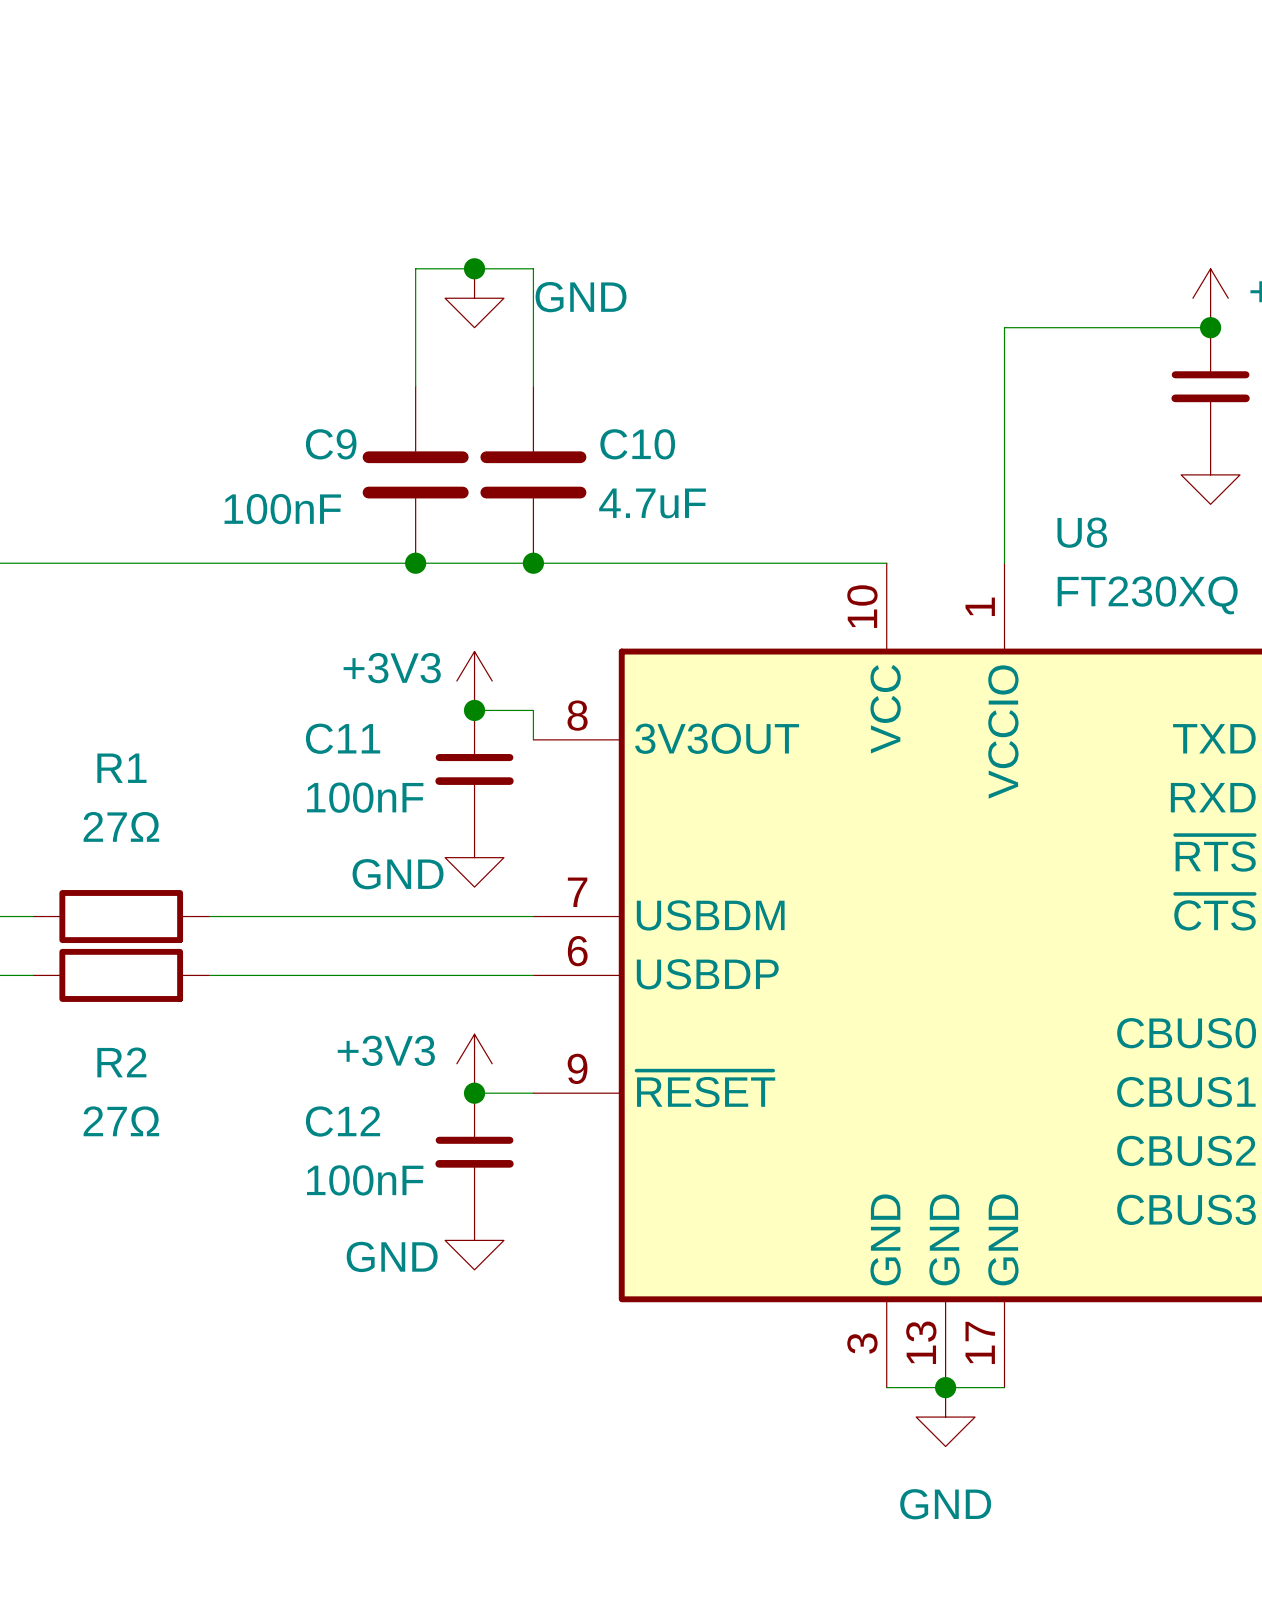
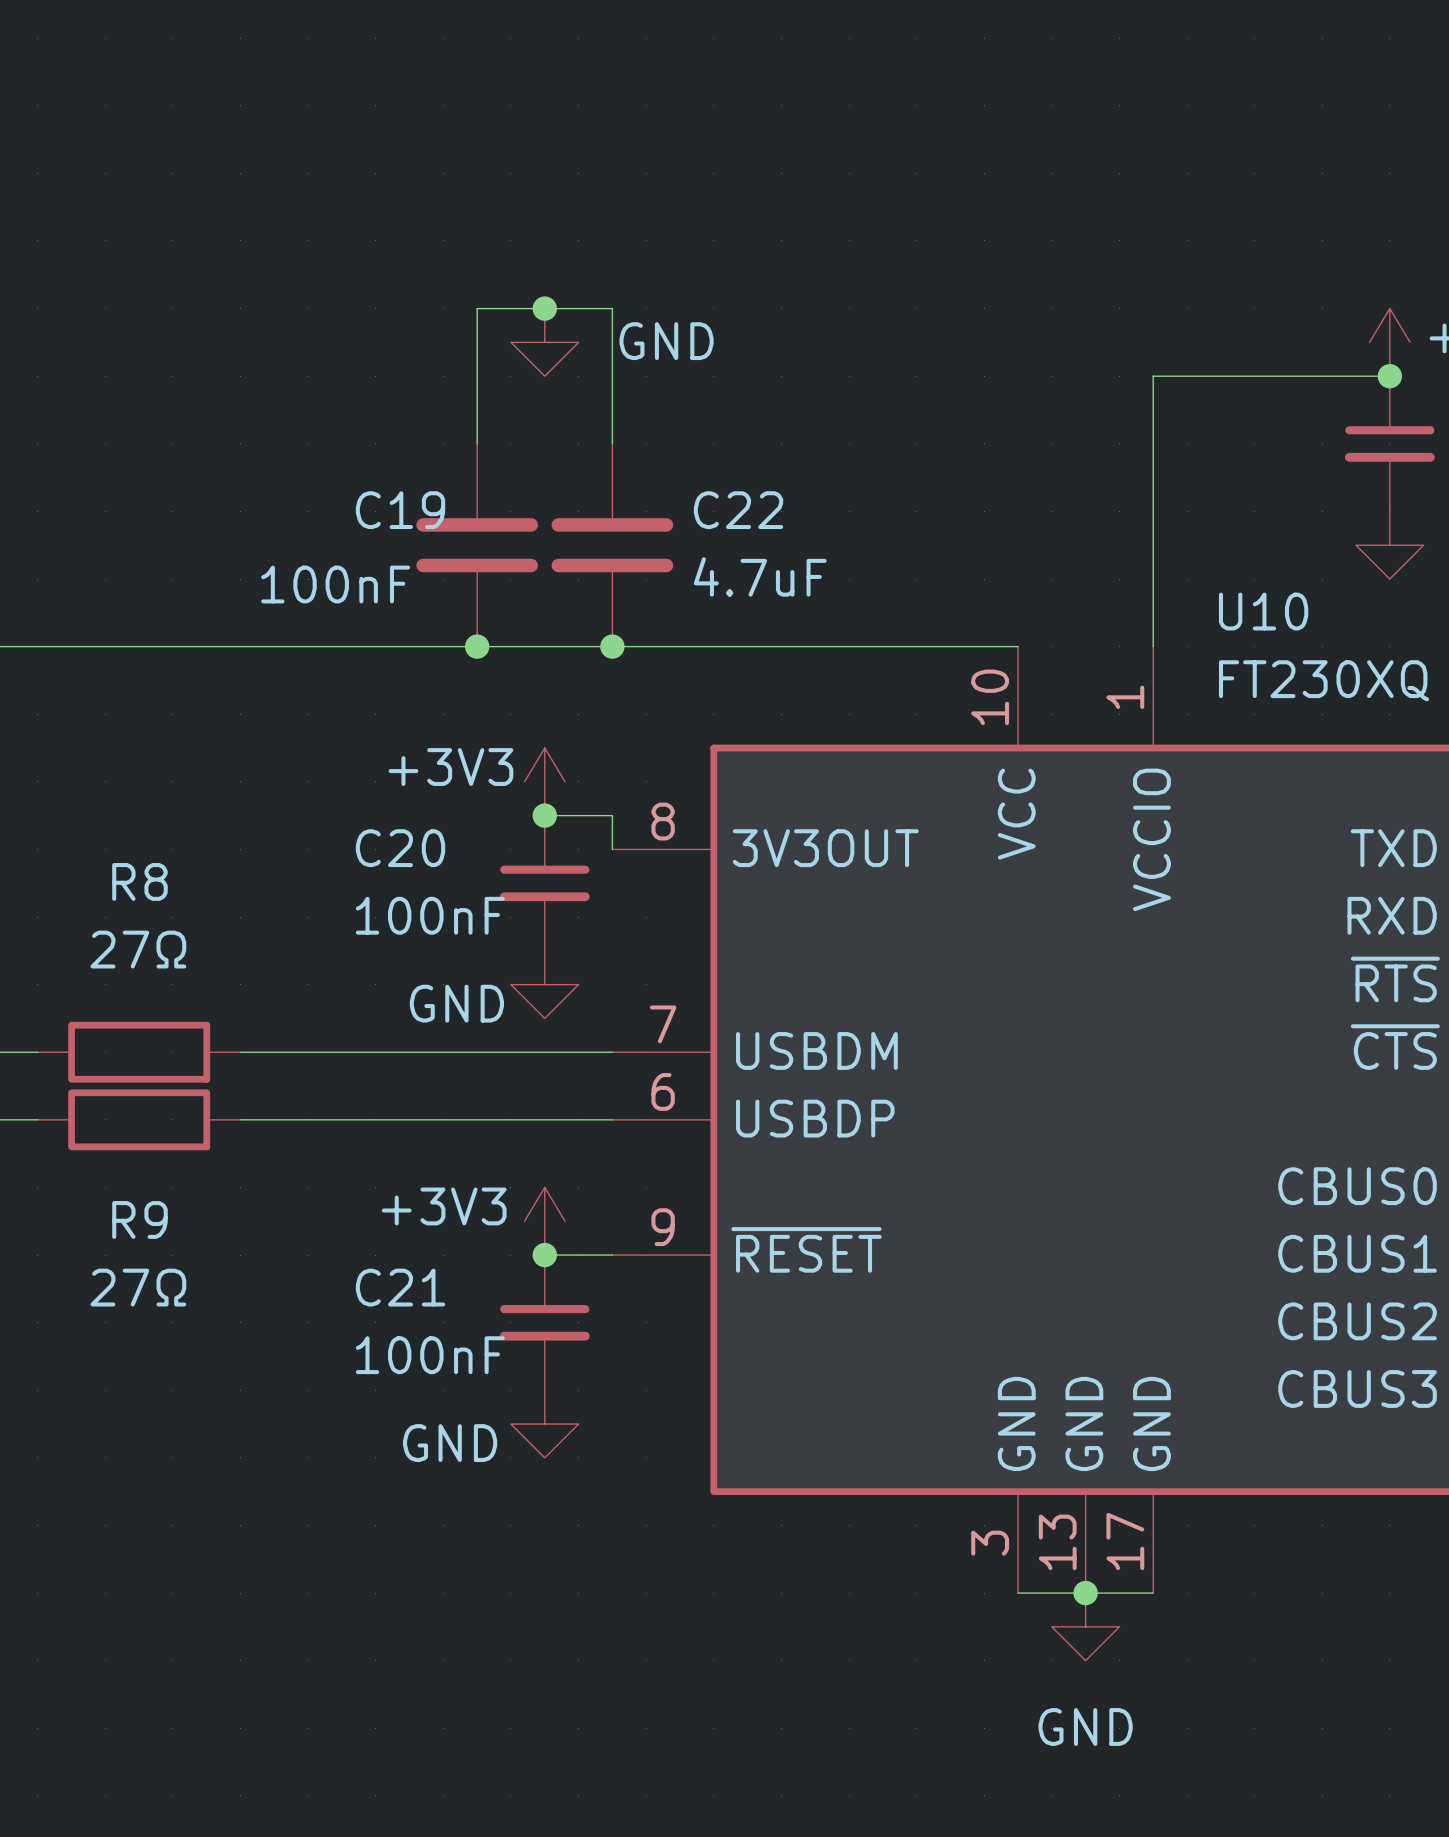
C9 name: C9 (331, 444) -> C19 (400, 510)
C10 name: C10 (637, 444) -> C22 (738, 510)
U8 name: U8 (1082, 532) -> U10 (1263, 611)
C11 name: C11 (343, 738) -> C20 (400, 848)
R1 name: R1 (121, 768) -> R8 (139, 881)
R2 name: R2 (121, 1062) -> R9 (139, 1219)
C12 name: C12 (343, 1121) -> C21 (400, 1287)

